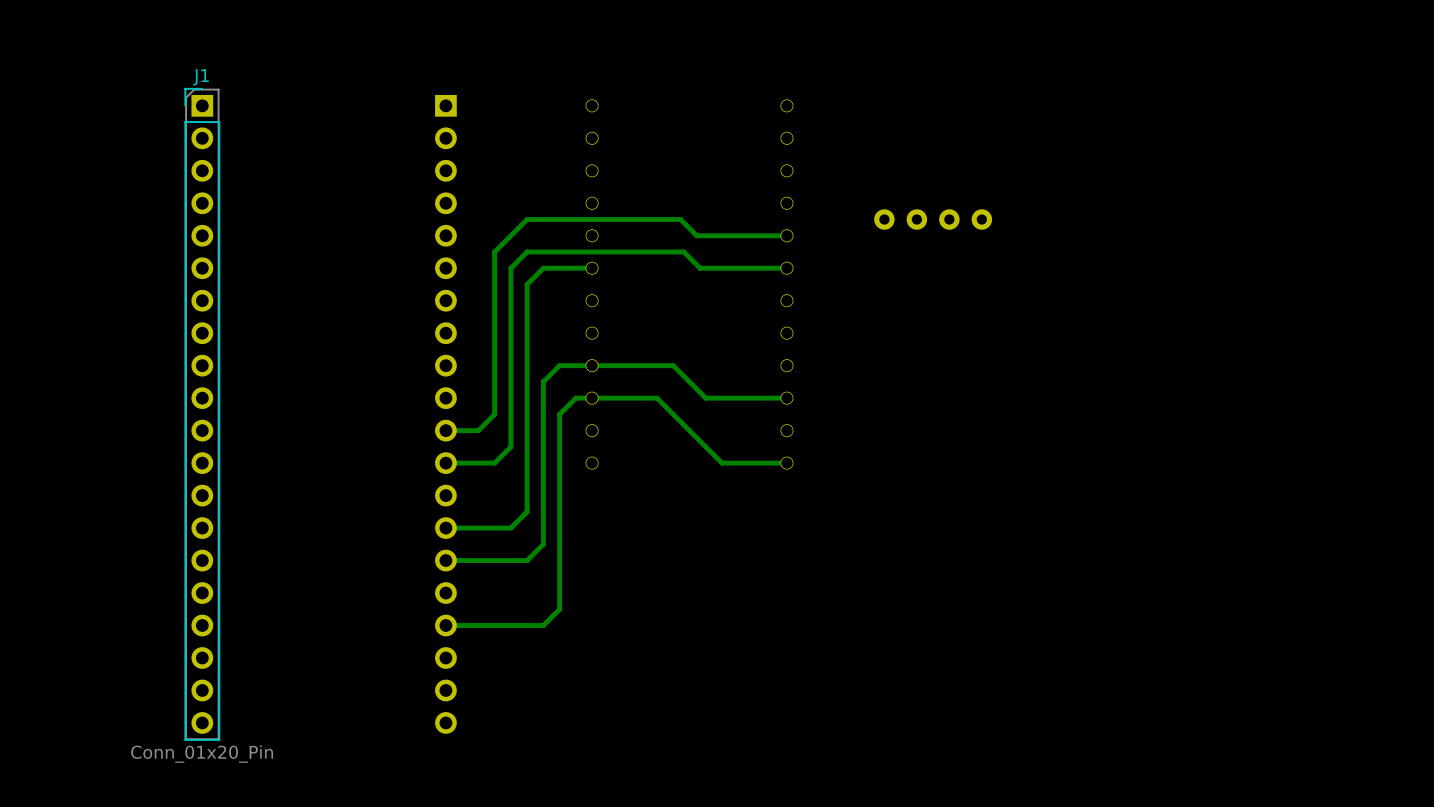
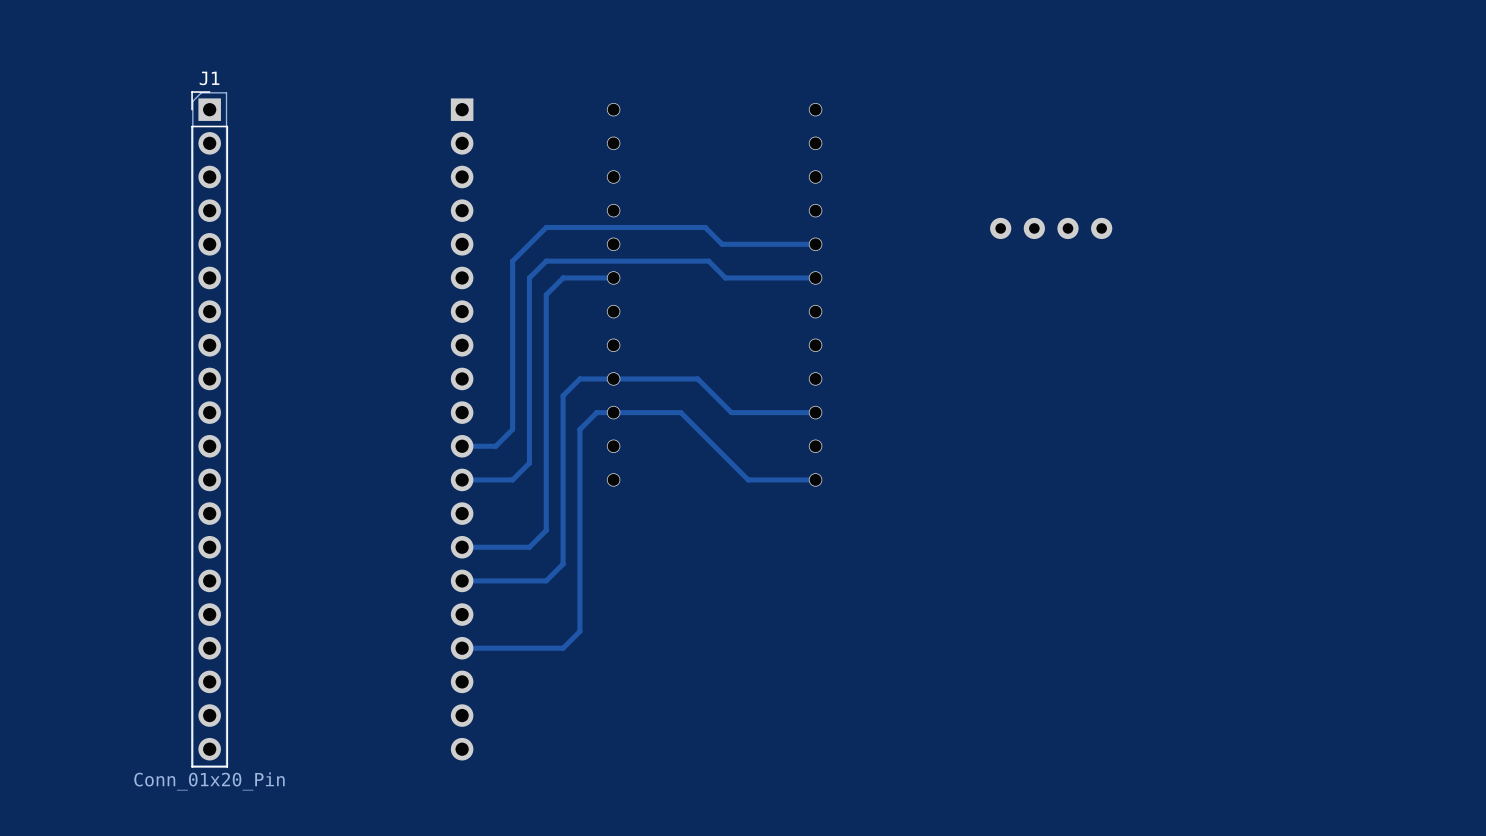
part position: (933, 219) -> (1051, 228)

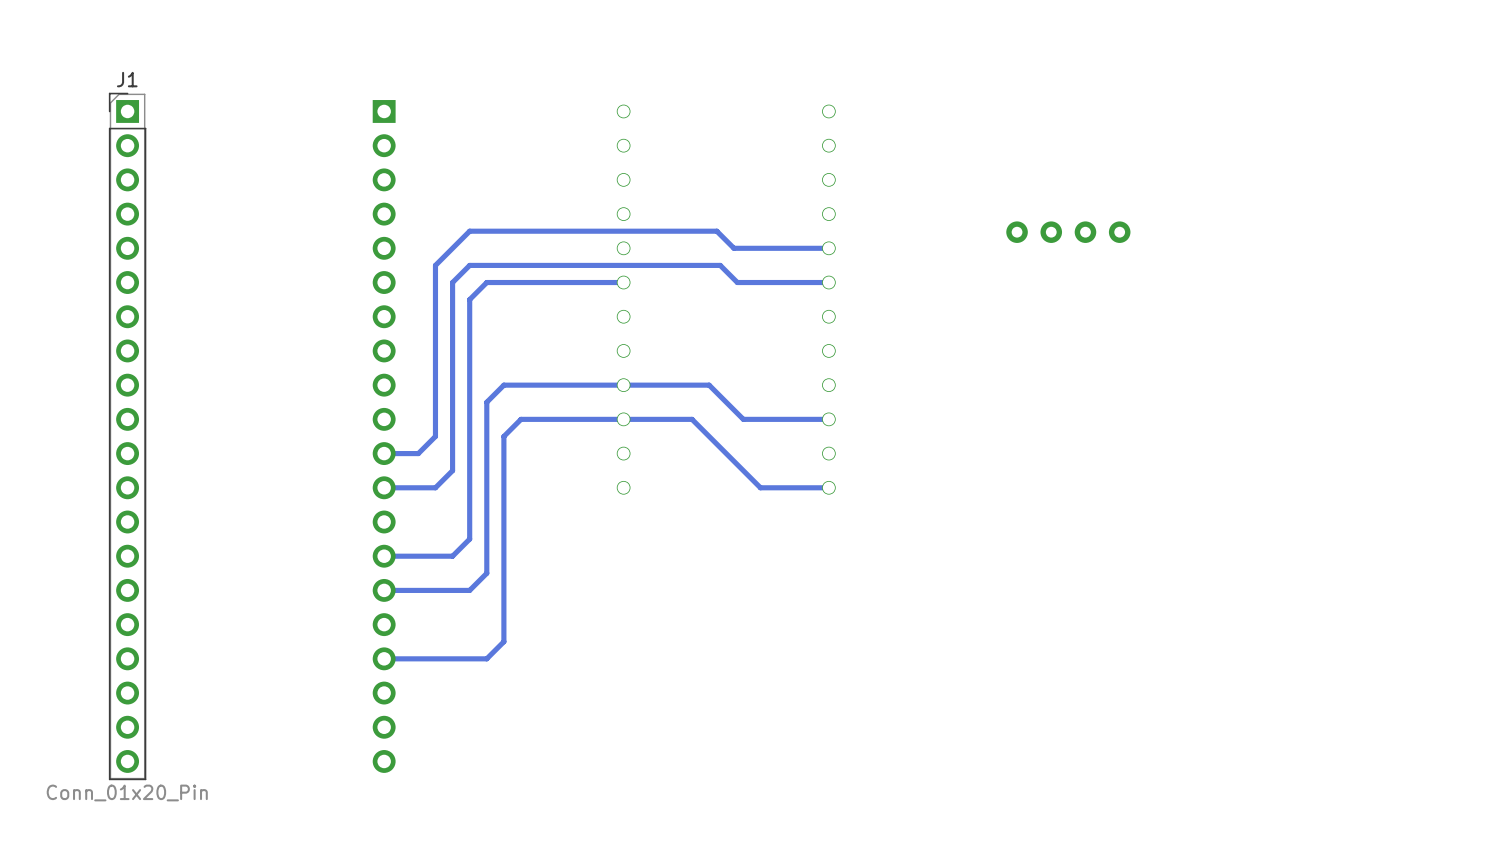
track: (546, 227) (512, 261) (512, 429) (495, 446) (462, 446) -> (555, 231) (469, 231) (435, 265) (435, 436) (418, 453) (384, 453)
track: (546, 261) (529, 277) (529, 463) (512, 479) (462, 479) -> (555, 265) (469, 265) (452, 282) (452, 470) (435, 487) (384, 487)
track: (563, 277) (546, 294) (546, 530) (529, 547) (462, 547) -> (572, 282) (486, 282) (469, 299) (469, 539) (452, 556) (384, 556)
track: (579, 378) (563, 395) (563, 564) (546, 580) (462, 580) -> (589, 385) (503, 385) (486, 402) (486, 573) (469, 590) (384, 590)
track: (596, 412) (579, 429) (579, 631) (563, 648) (478, 648) -> (606, 419) (521, 419) (503, 436) (503, 641) (486, 658)
J1 position: (209, 429) -> (127, 436)
part position: (462, 429) -> (384, 436)
track: none -> (469, 658) (384, 658)

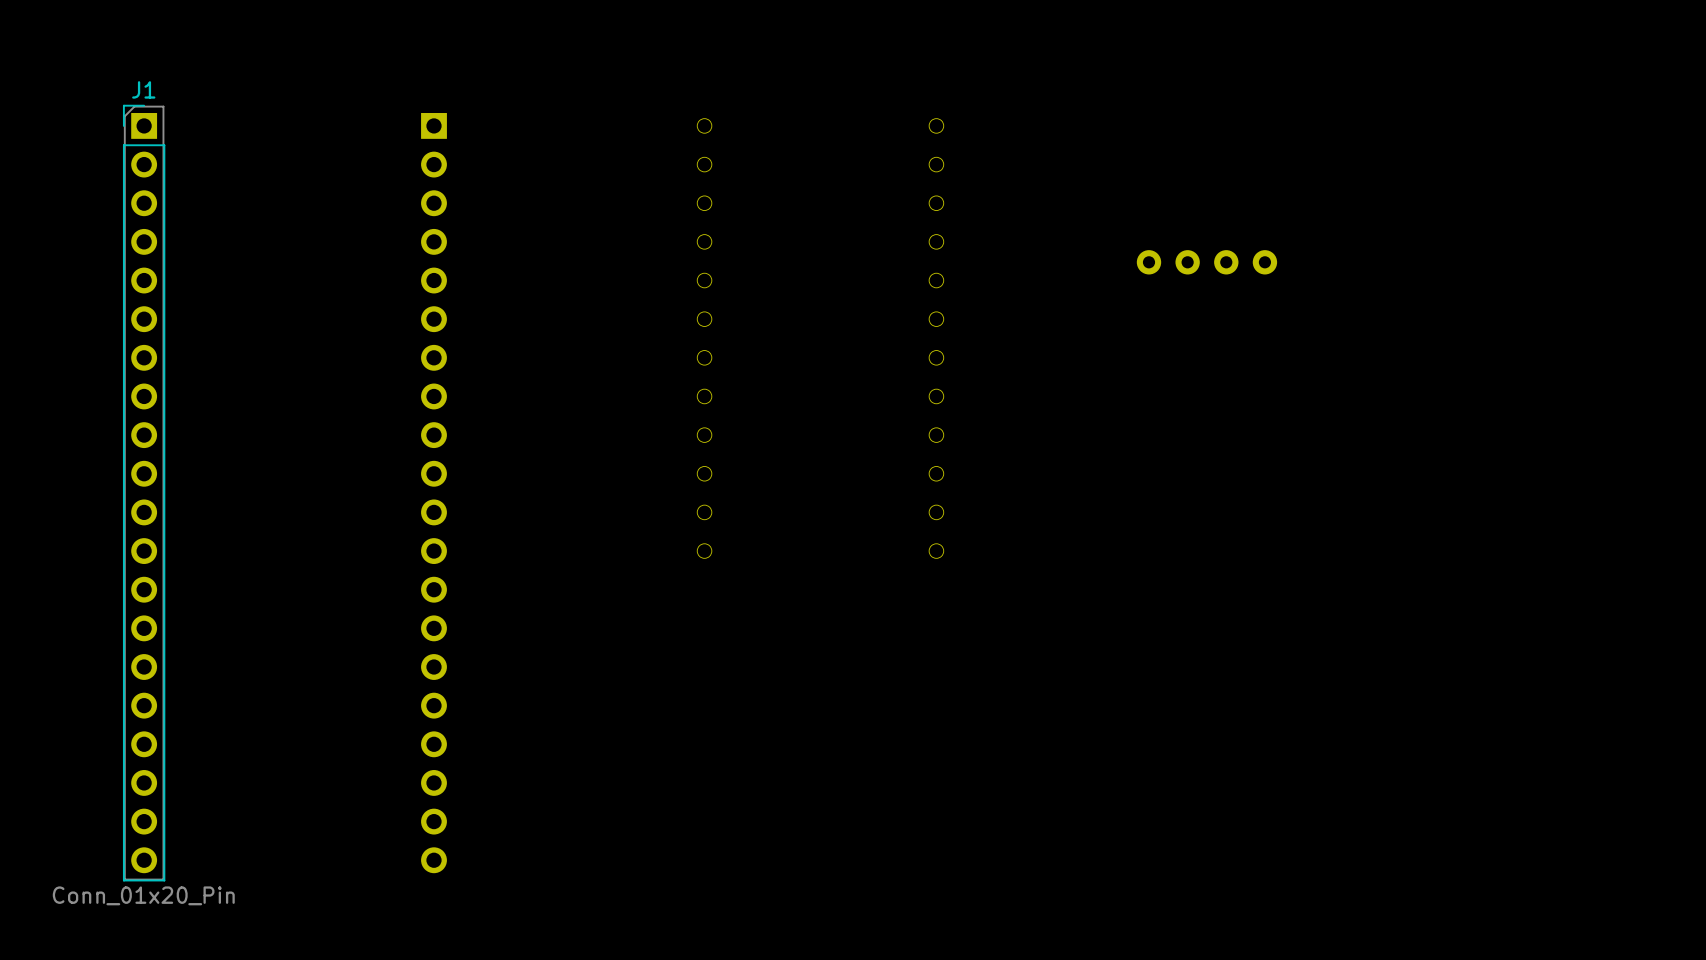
track: (828, 248) (733, 248) (716, 231) (469, 231) (435, 265) (435, 436) (418, 453) (384, 453) -> none
track: (623, 282) (486, 282) (469, 299) (469, 539) (452, 556) (384, 556) -> none
track: (828, 282) (737, 282) (720, 265) (469, 265) (452, 282) (452, 470) (435, 487) (384, 487) -> none
track: (828, 419) (743, 419) (709, 385) (503, 385) (486, 402) (486, 573) (469, 590) (384, 590) -> none
track: (828, 487) (760, 487) (692, 419) (521, 419) (503, 436) (503, 641) (486, 658) (384, 658) -> none

